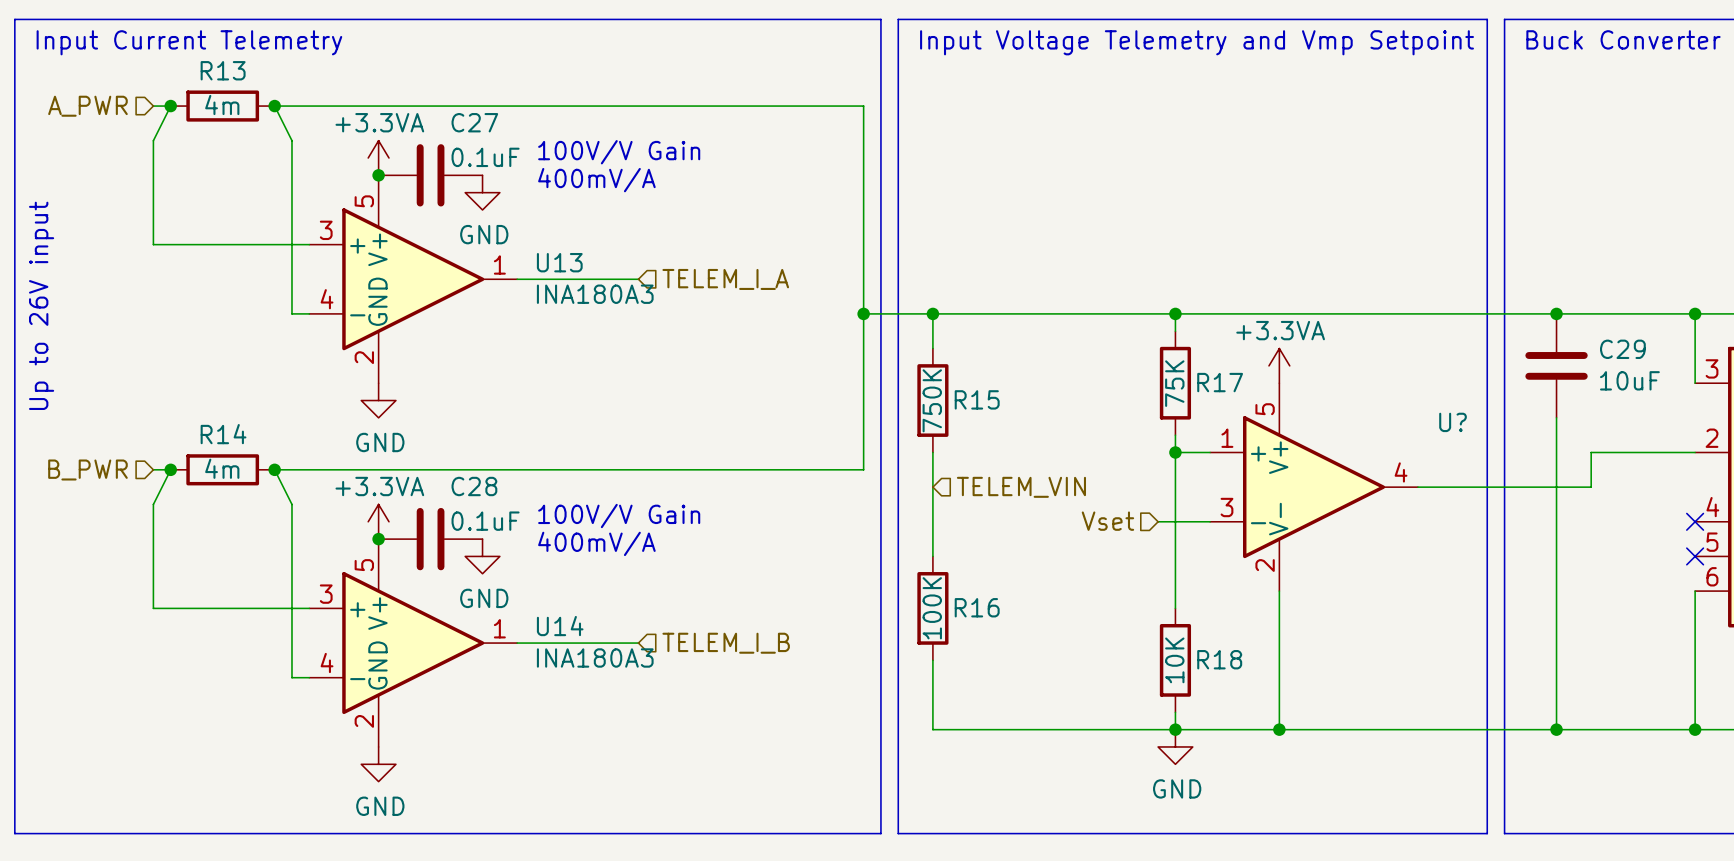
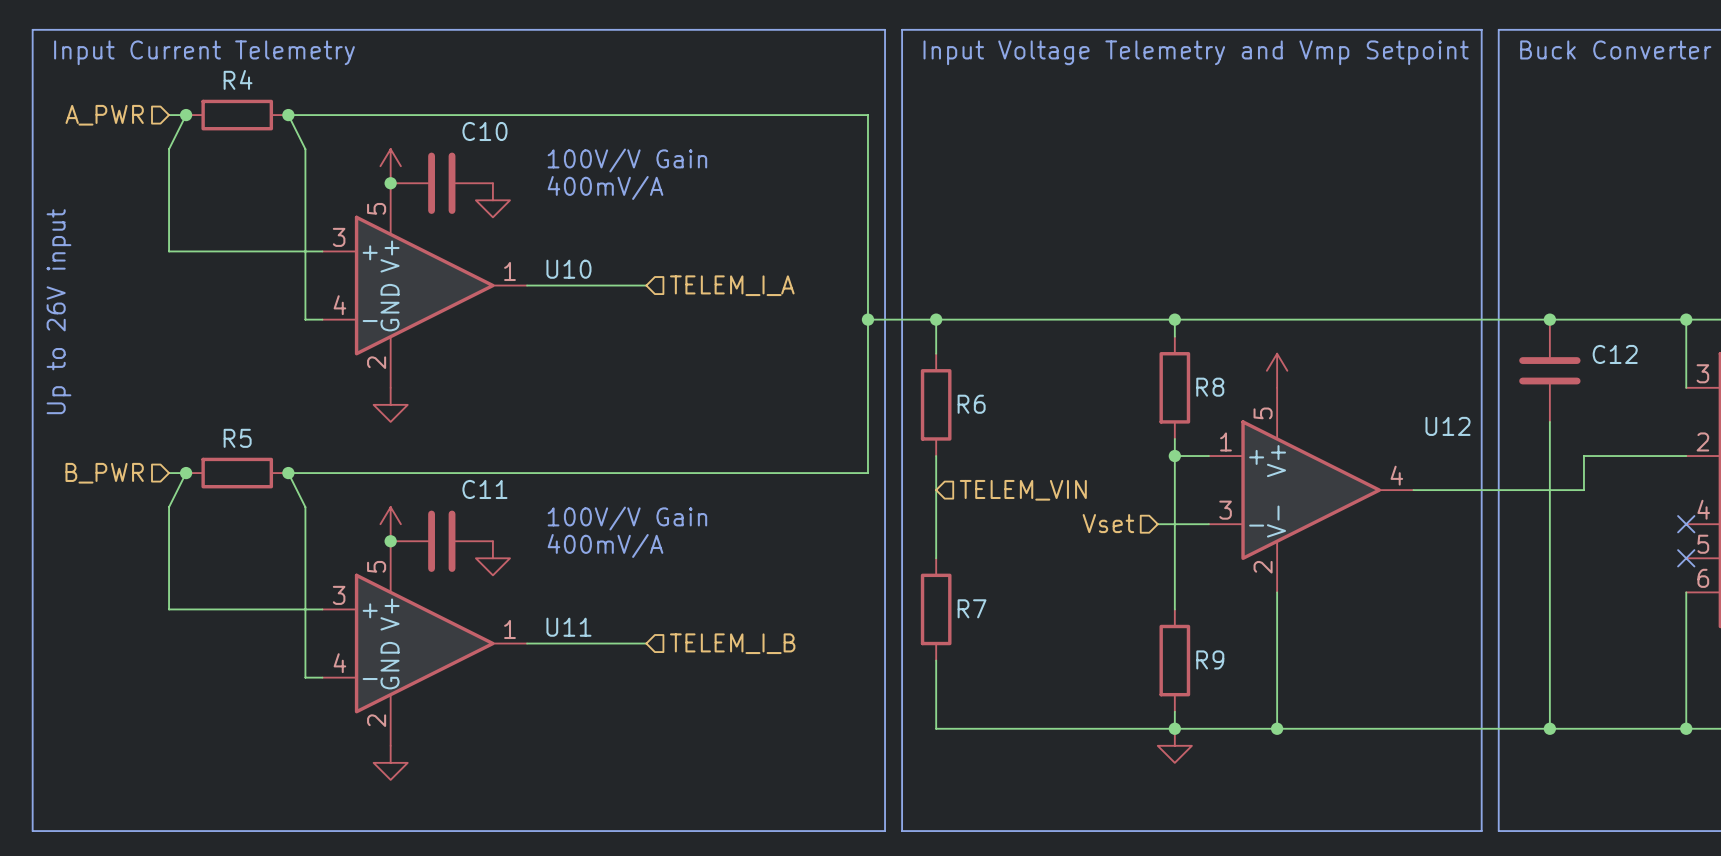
R13 name: R13 (223, 70) -> R4 (238, 79)
R13 value: 4m (222, 104) -> none
power symbol text: +3.3VA (379, 122) -> none
C27 name: C27 (474, 122) -> C10 (484, 131)
C27 value: 0.1uF (485, 157) -> none
power symbol text: GND (484, 234) -> none
U13 name: U13 (559, 262) -> U10 (568, 269)
U13 value: INA180A3 (595, 294) -> none
power symbol text: +3.3VA (1280, 330) -> none
C29 name: C29 (1622, 349) -> C12 (1615, 354)
C29 value: 10uF (1629, 380) -> none
R17 name: R17 (1220, 382) -> R8 (1210, 387)
R17 value: 75K (1174, 383) -> none
R15 name: R15 (977, 399) -> R6 (971, 404)
R15 value: 750K (932, 400) -> none
U? name: U? (1453, 422) -> U12 (1448, 426)
R14 name: R14 (223, 434) -> R5 (237, 438)
power symbol text: GND (380, 442) -> none
R14 value: 4m (222, 468) -> none
power symbol text: +3.3VA (379, 486) -> none
C28 name: C28 (474, 486) -> C11 (484, 489)
C28 value: 0.1uF (485, 521) -> none
power symbol text: GND (484, 598) -> none
R16 name: R16 (977, 607) -> R7 (972, 608)
R16 value: 100K (932, 608) -> none
U14 name: U14 (560, 626) -> U11 (568, 627)
U14 value: INA180A3 (595, 657) -> none
R18 name: R18 (1219, 659) -> R9 (1210, 659)
R18 value: 10K (1174, 660) -> none
power symbol text: GND (1177, 788) -> none
power symbol text: GND (380, 806) -> none

